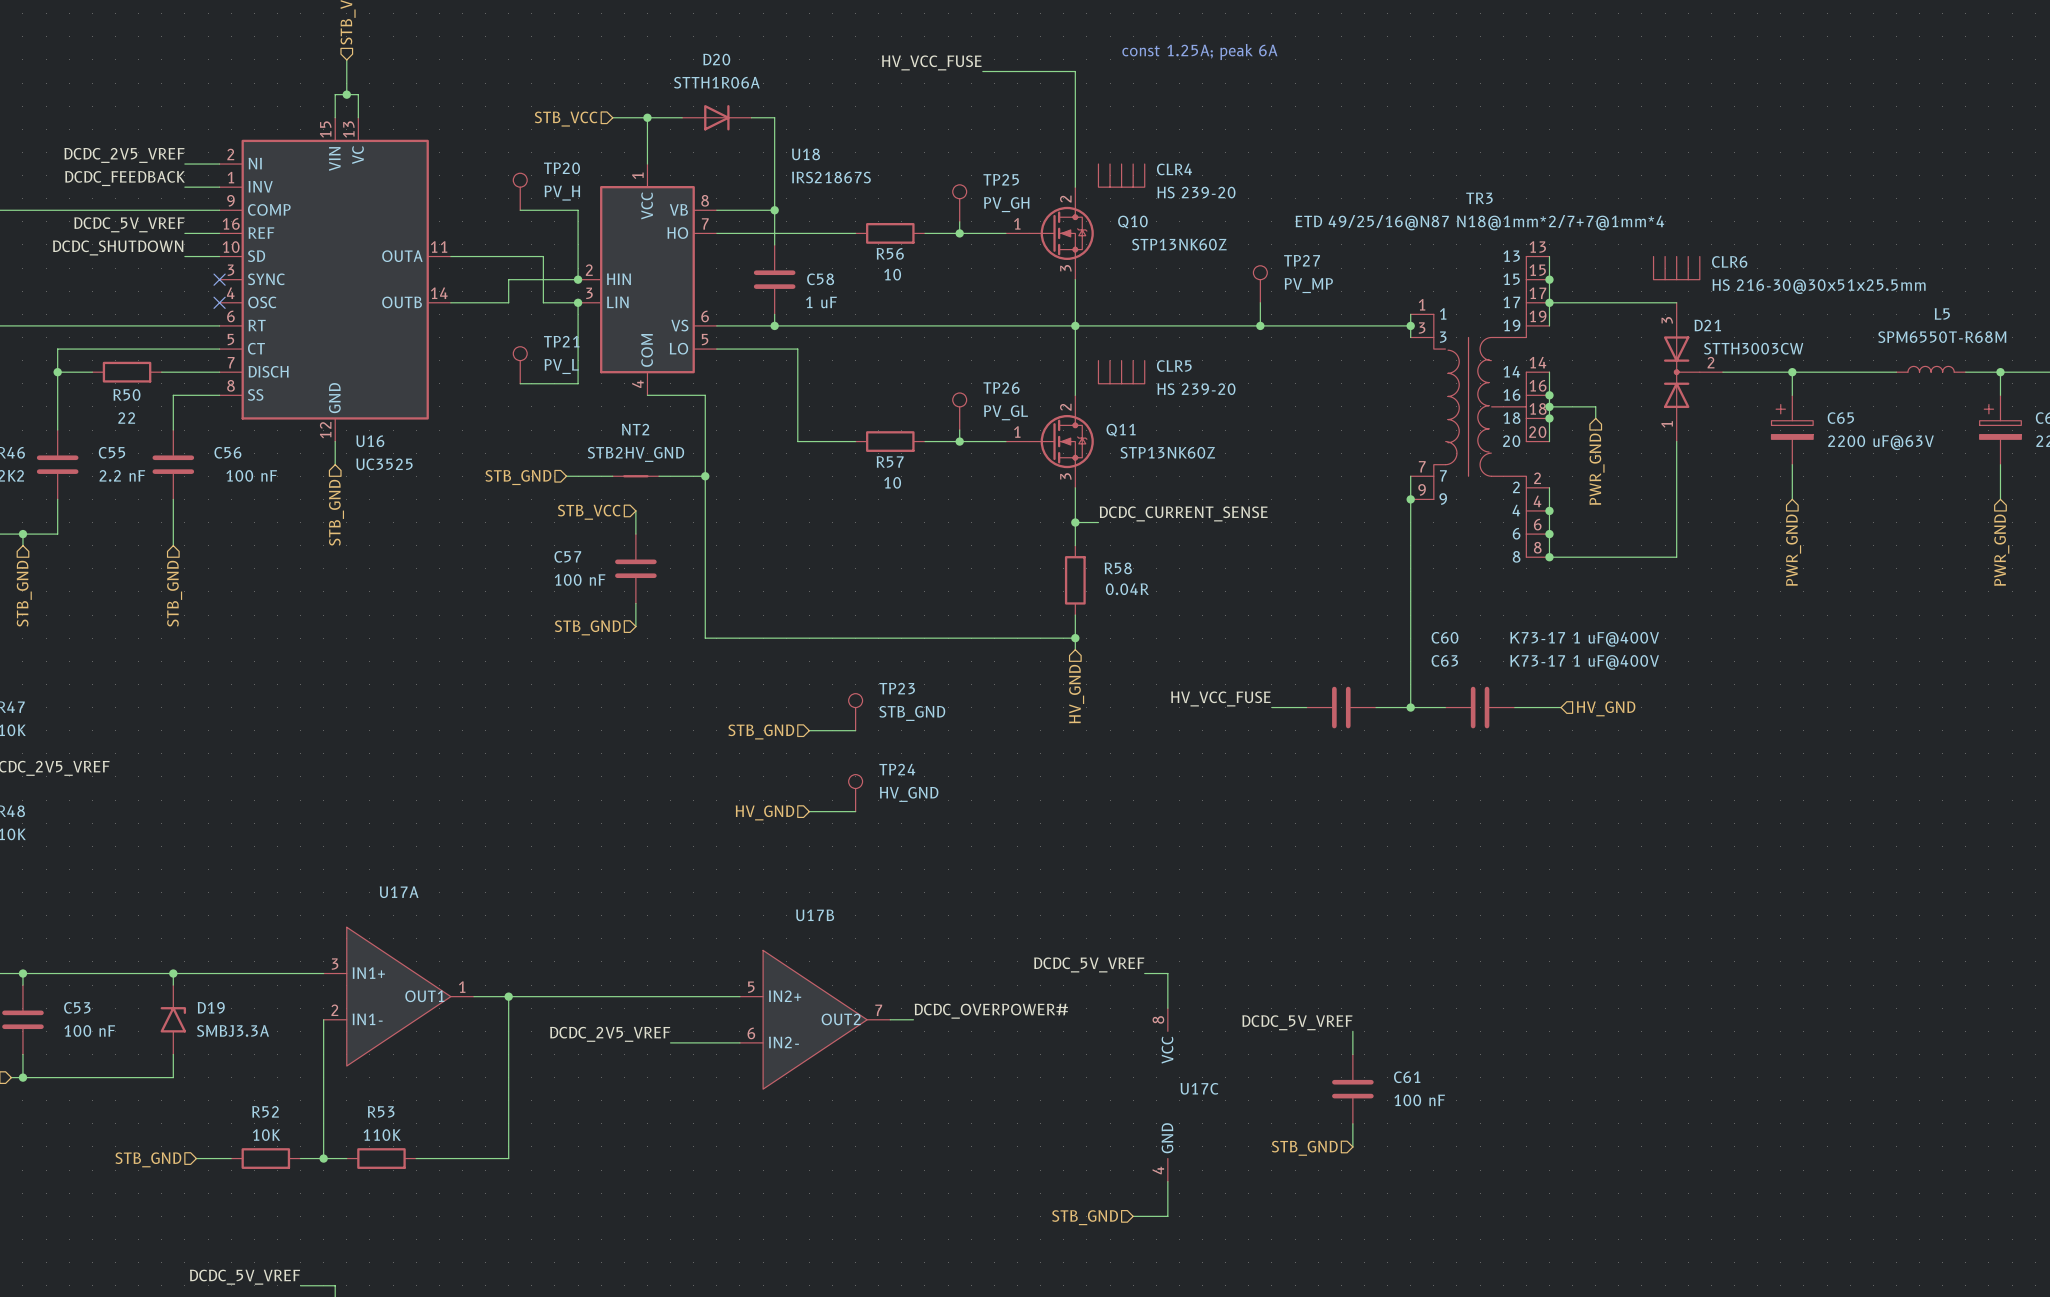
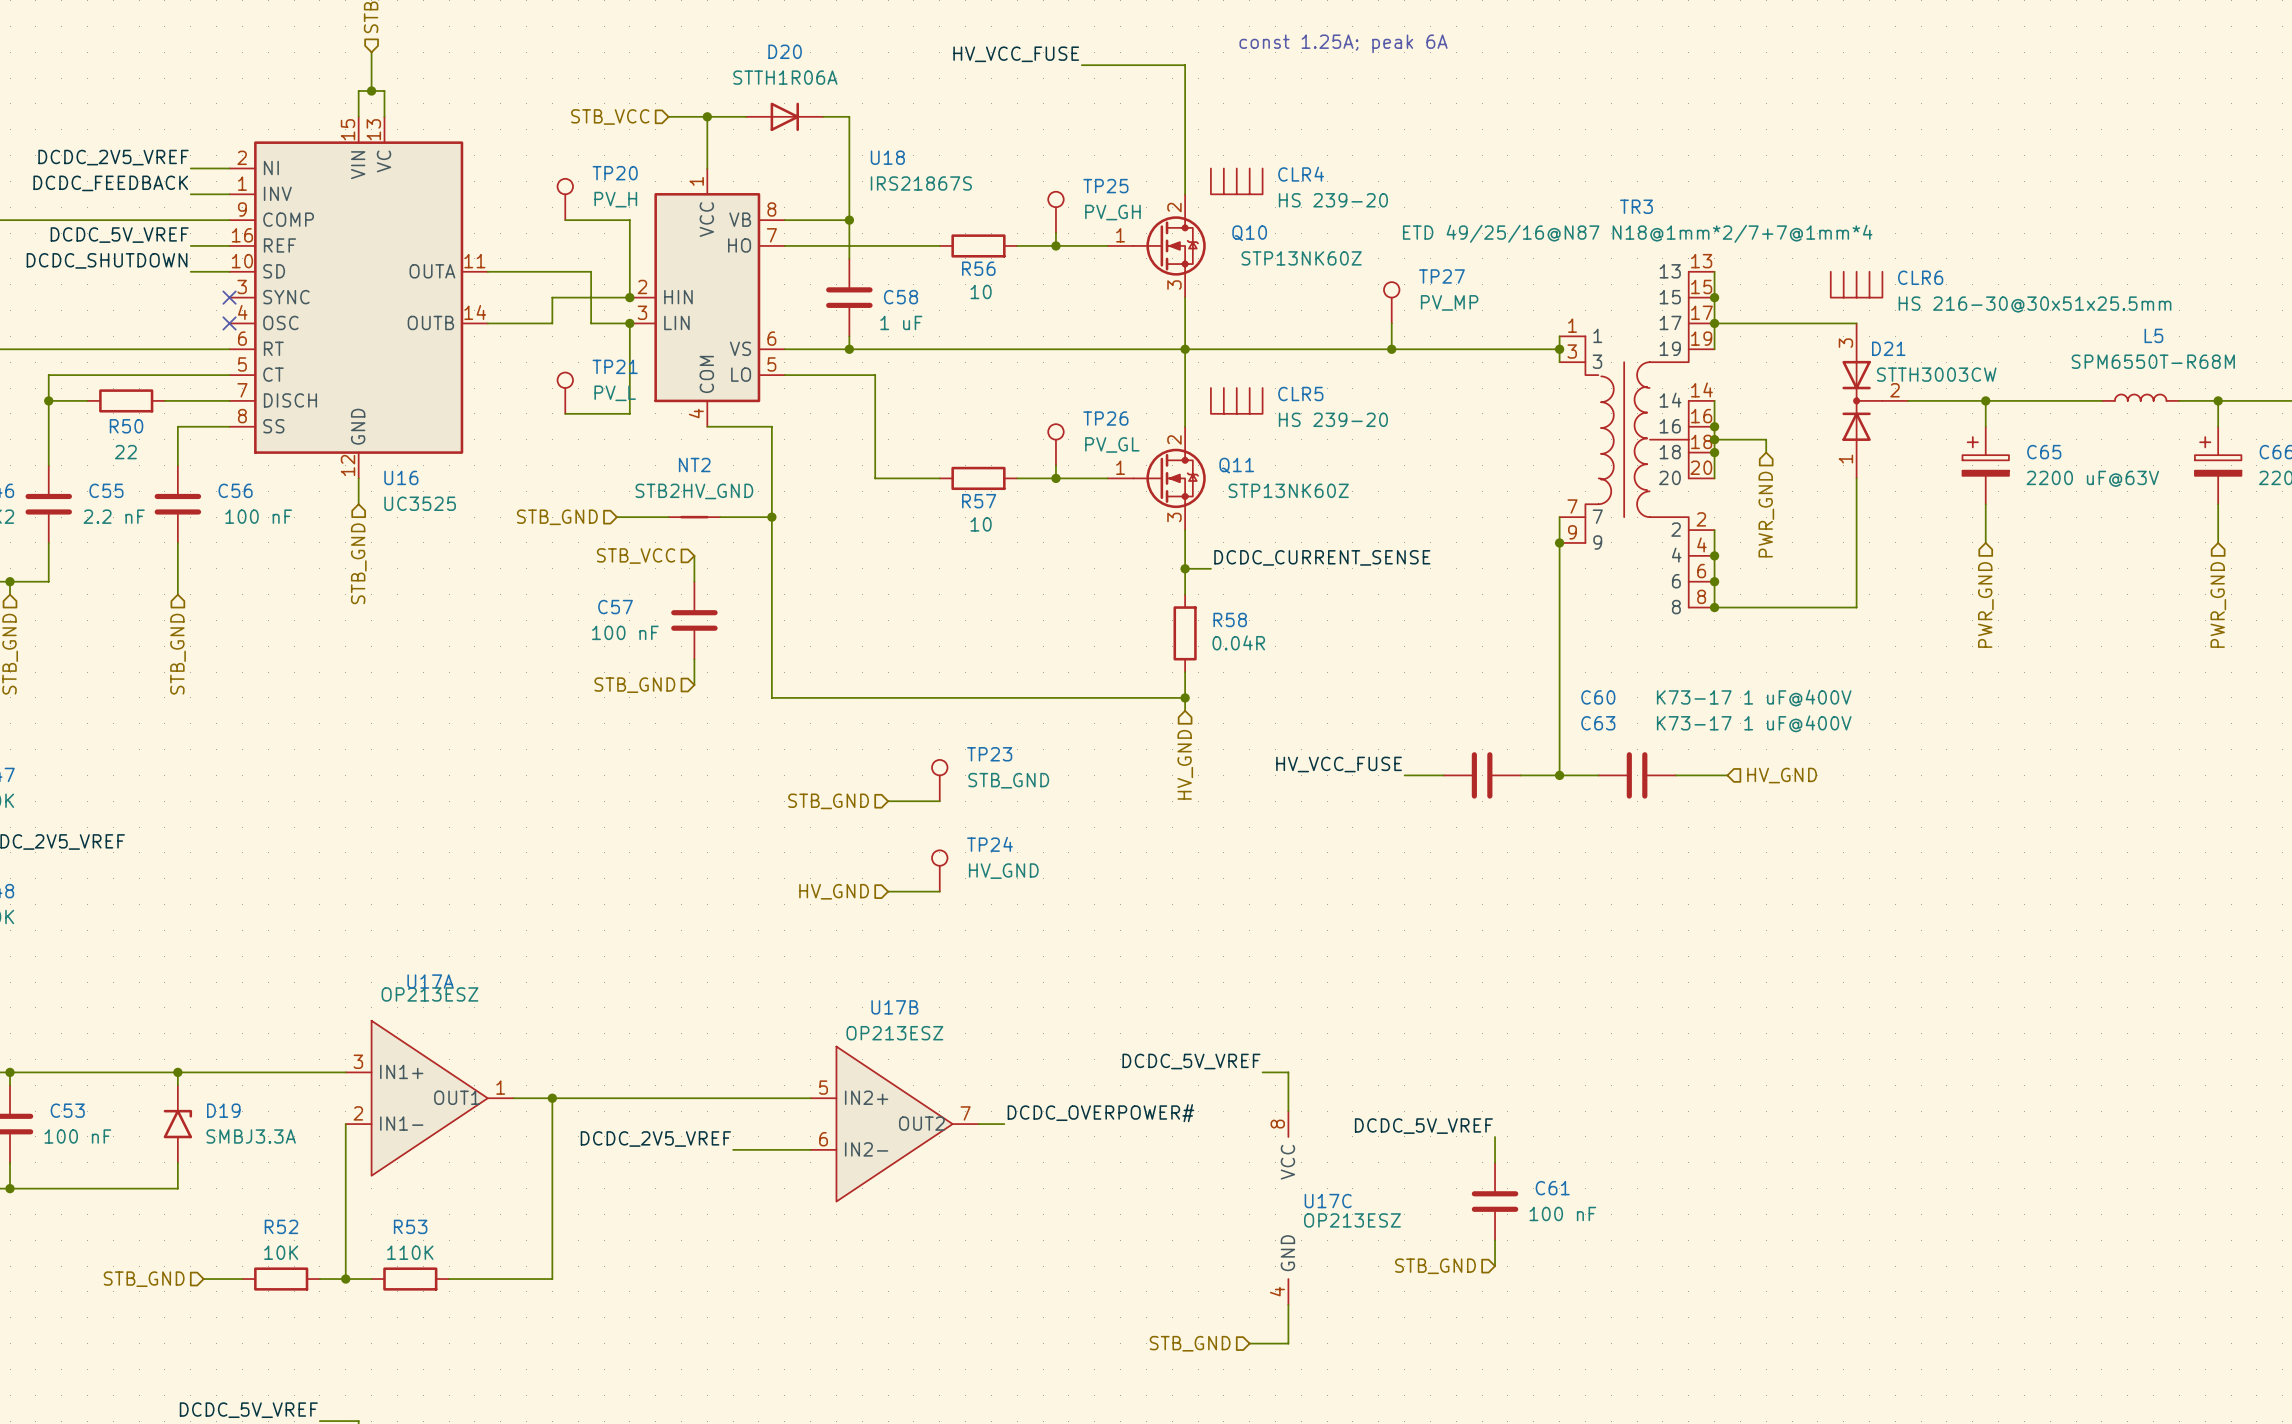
U17A value: none -> OP213ESZ (429, 994)
U17B value: none -> OP213ESZ (894, 1033)
U17C value: none -> OP213ESZ (1352, 1220)

